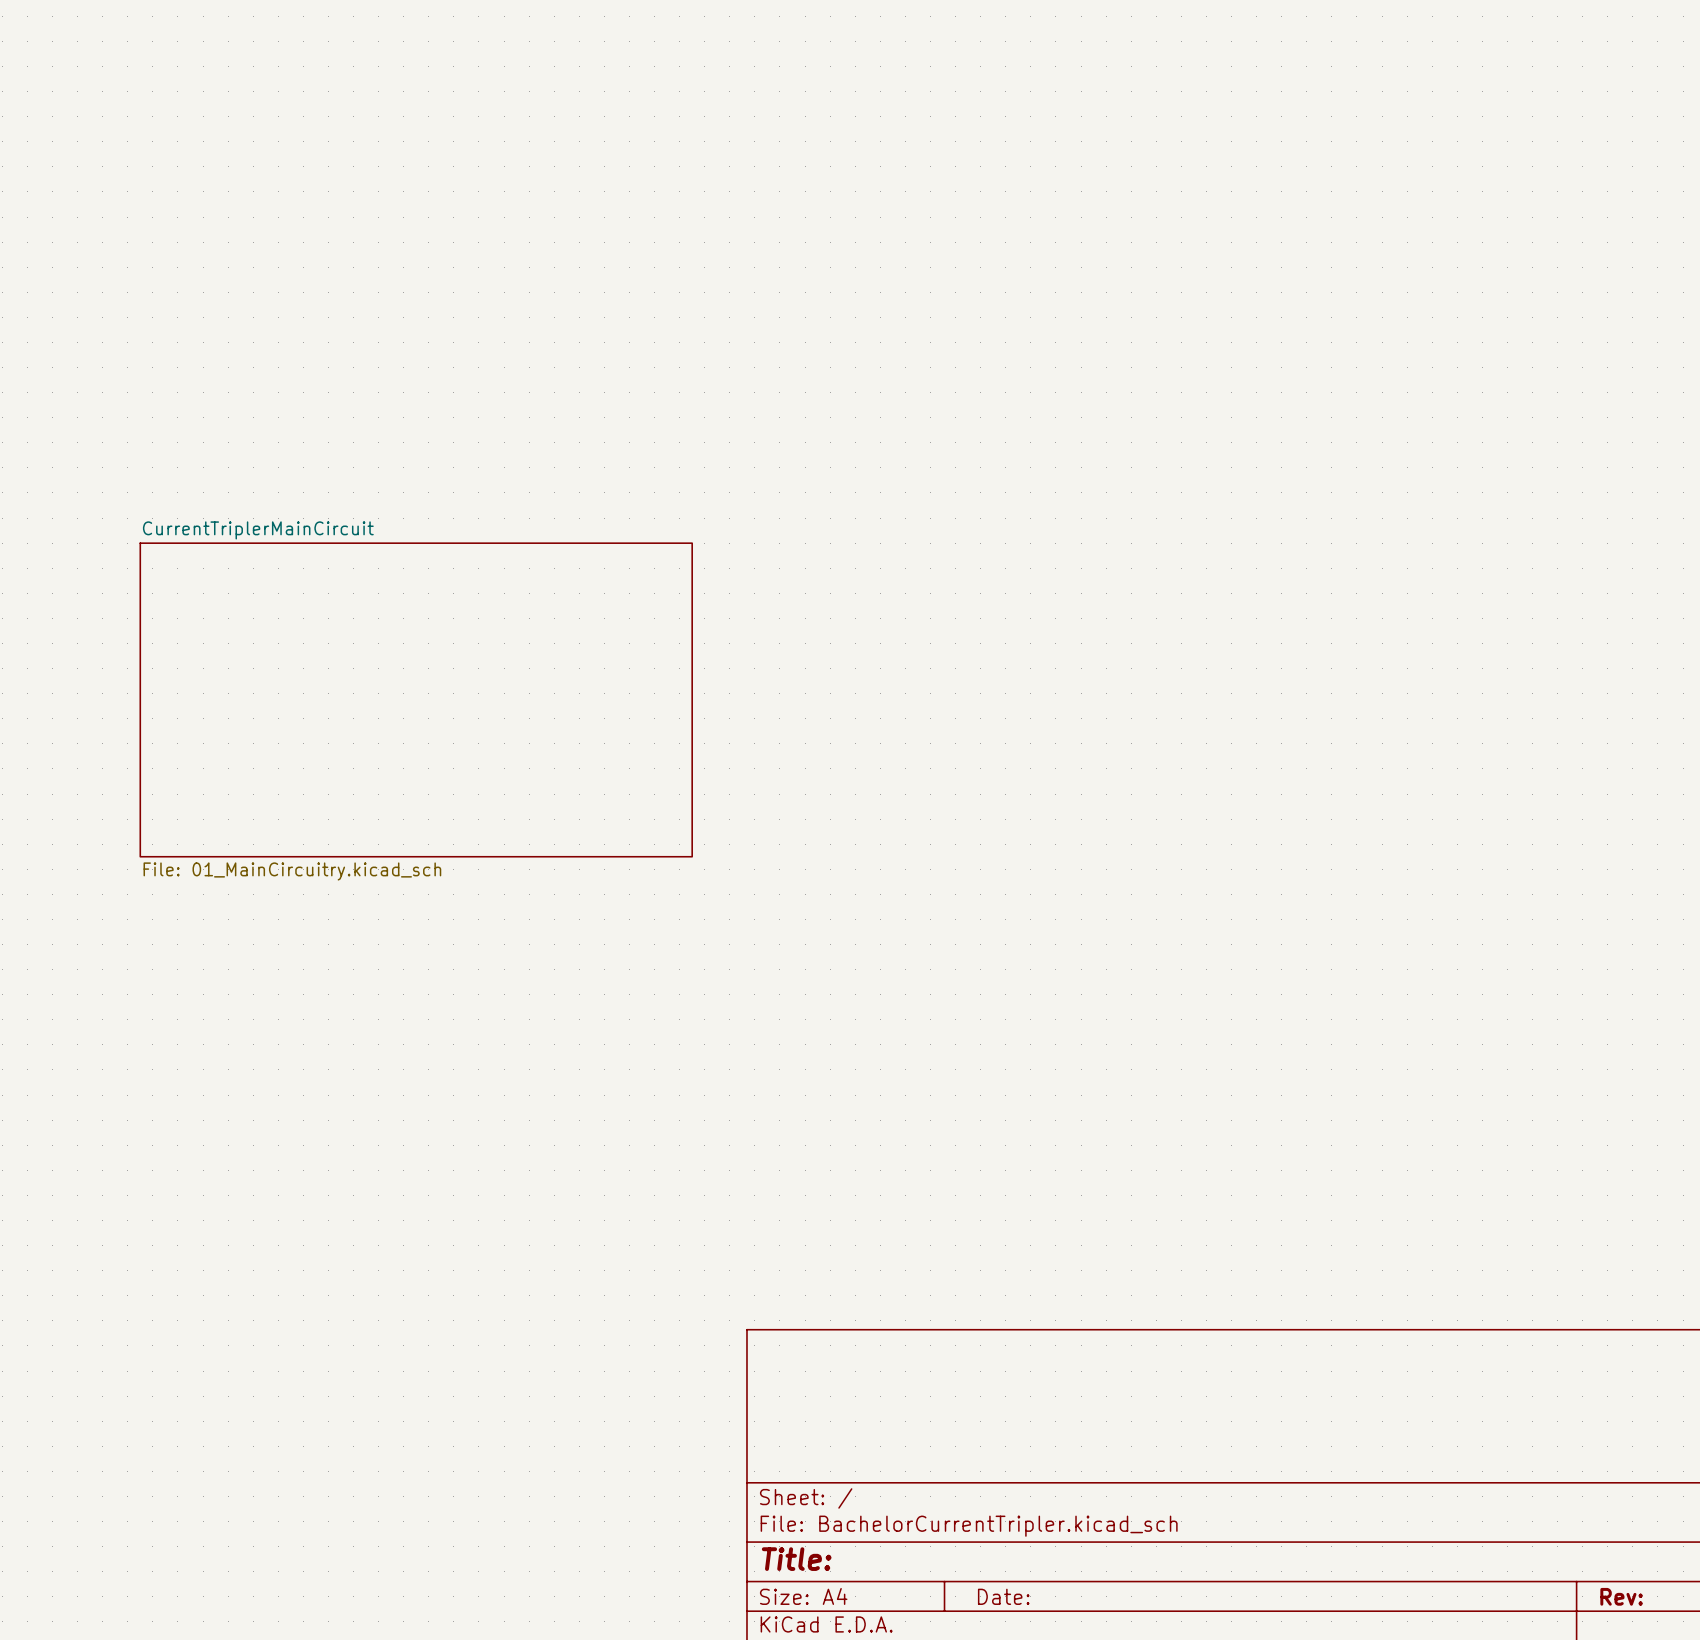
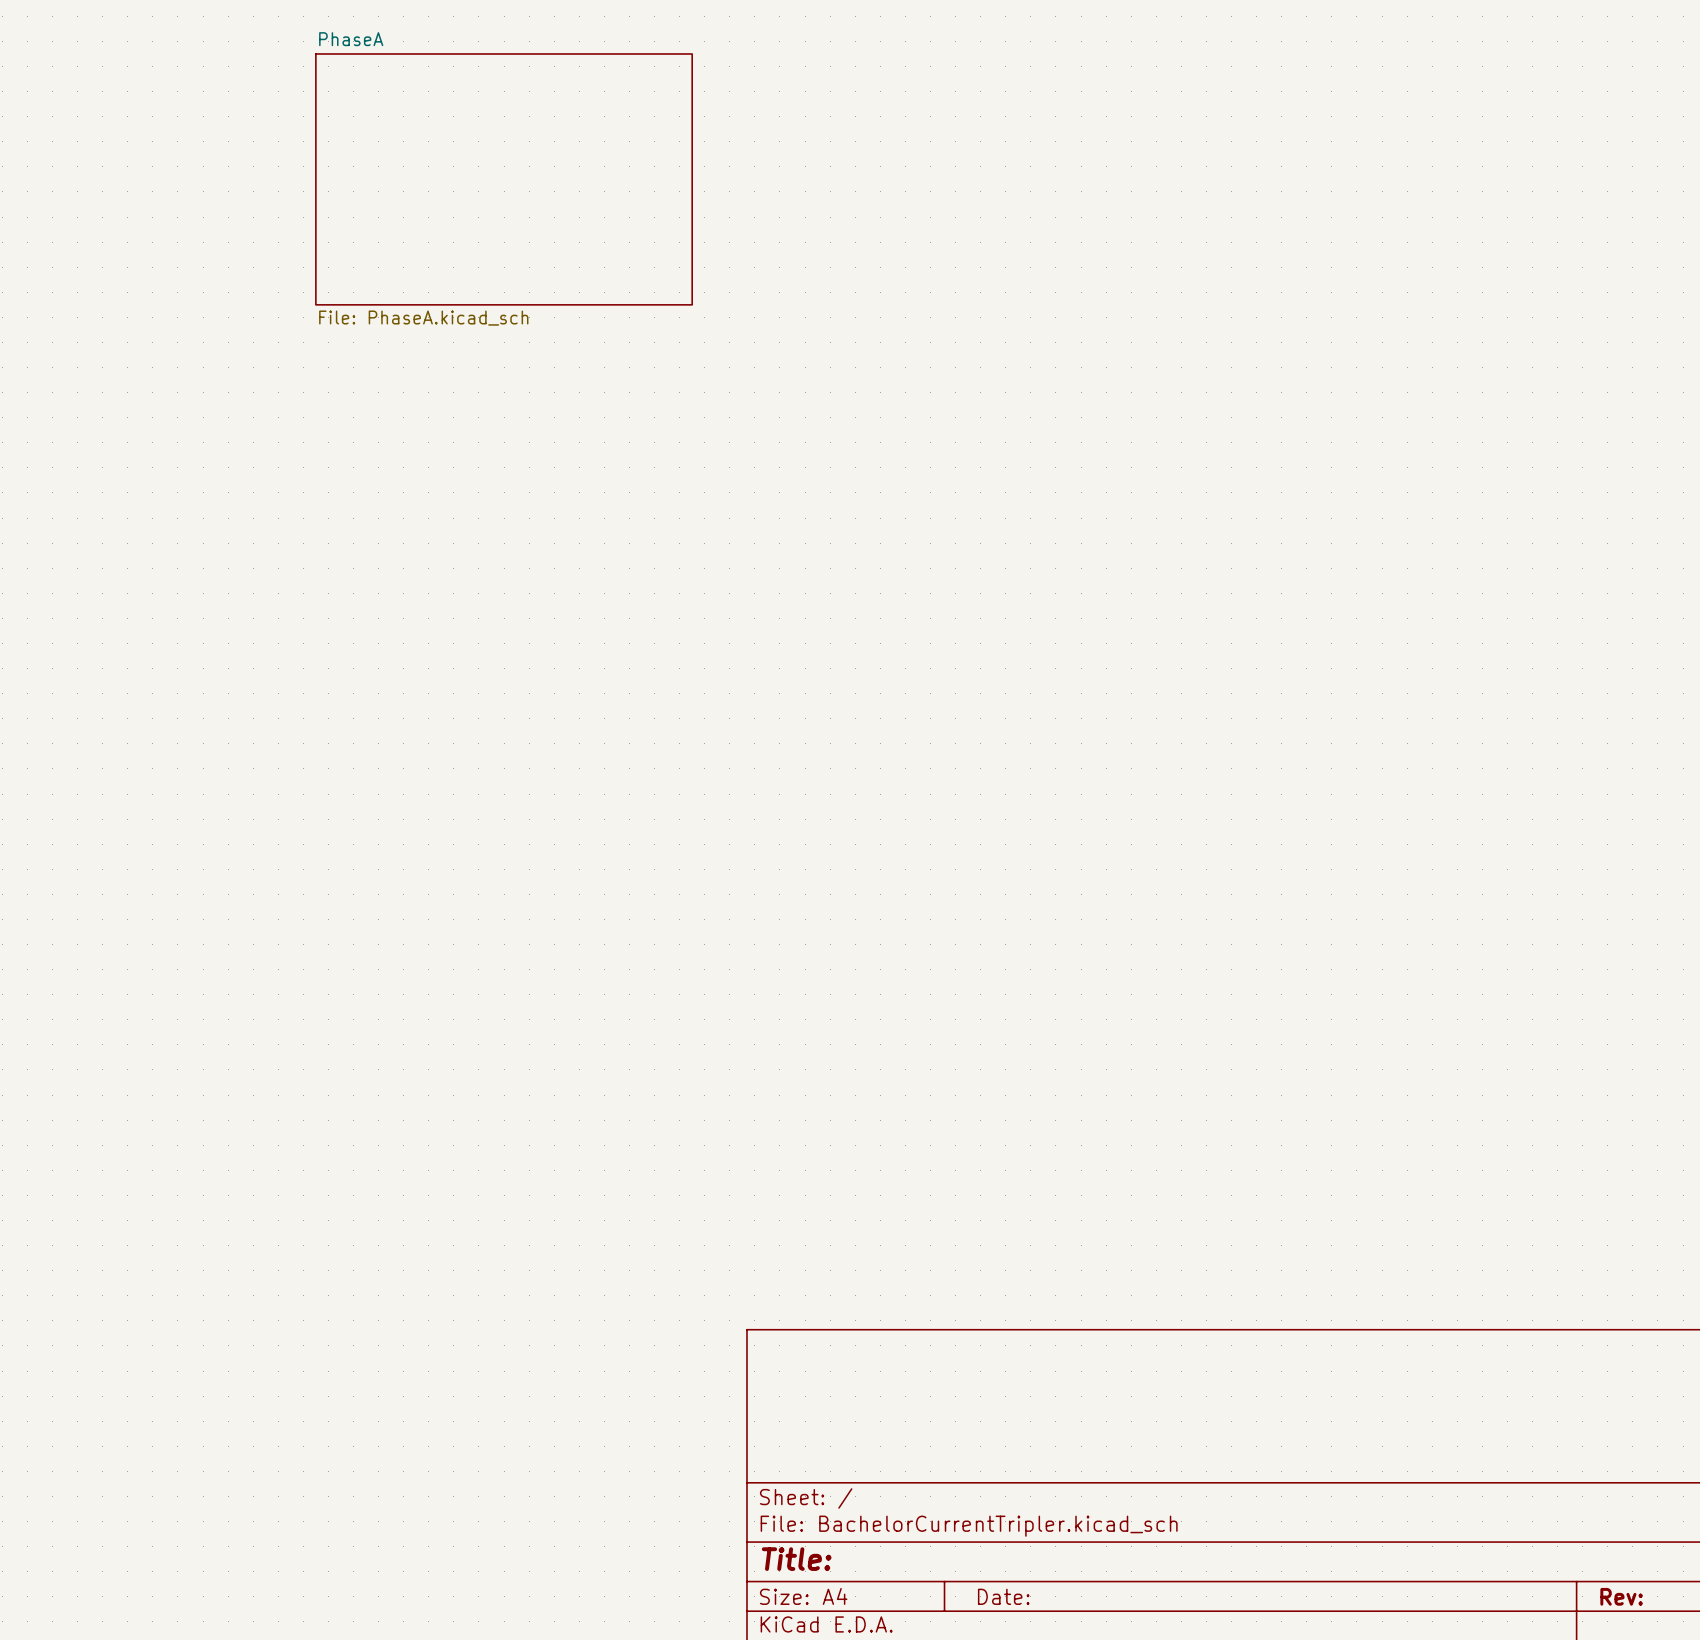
sheet PhaseA: none -> File: PhaseA.kicad_sch (504, 179)
sheet CurrentTriplerMainCircuit: File: 01_MainCircuitry.kicad_sch (416, 699) -> none

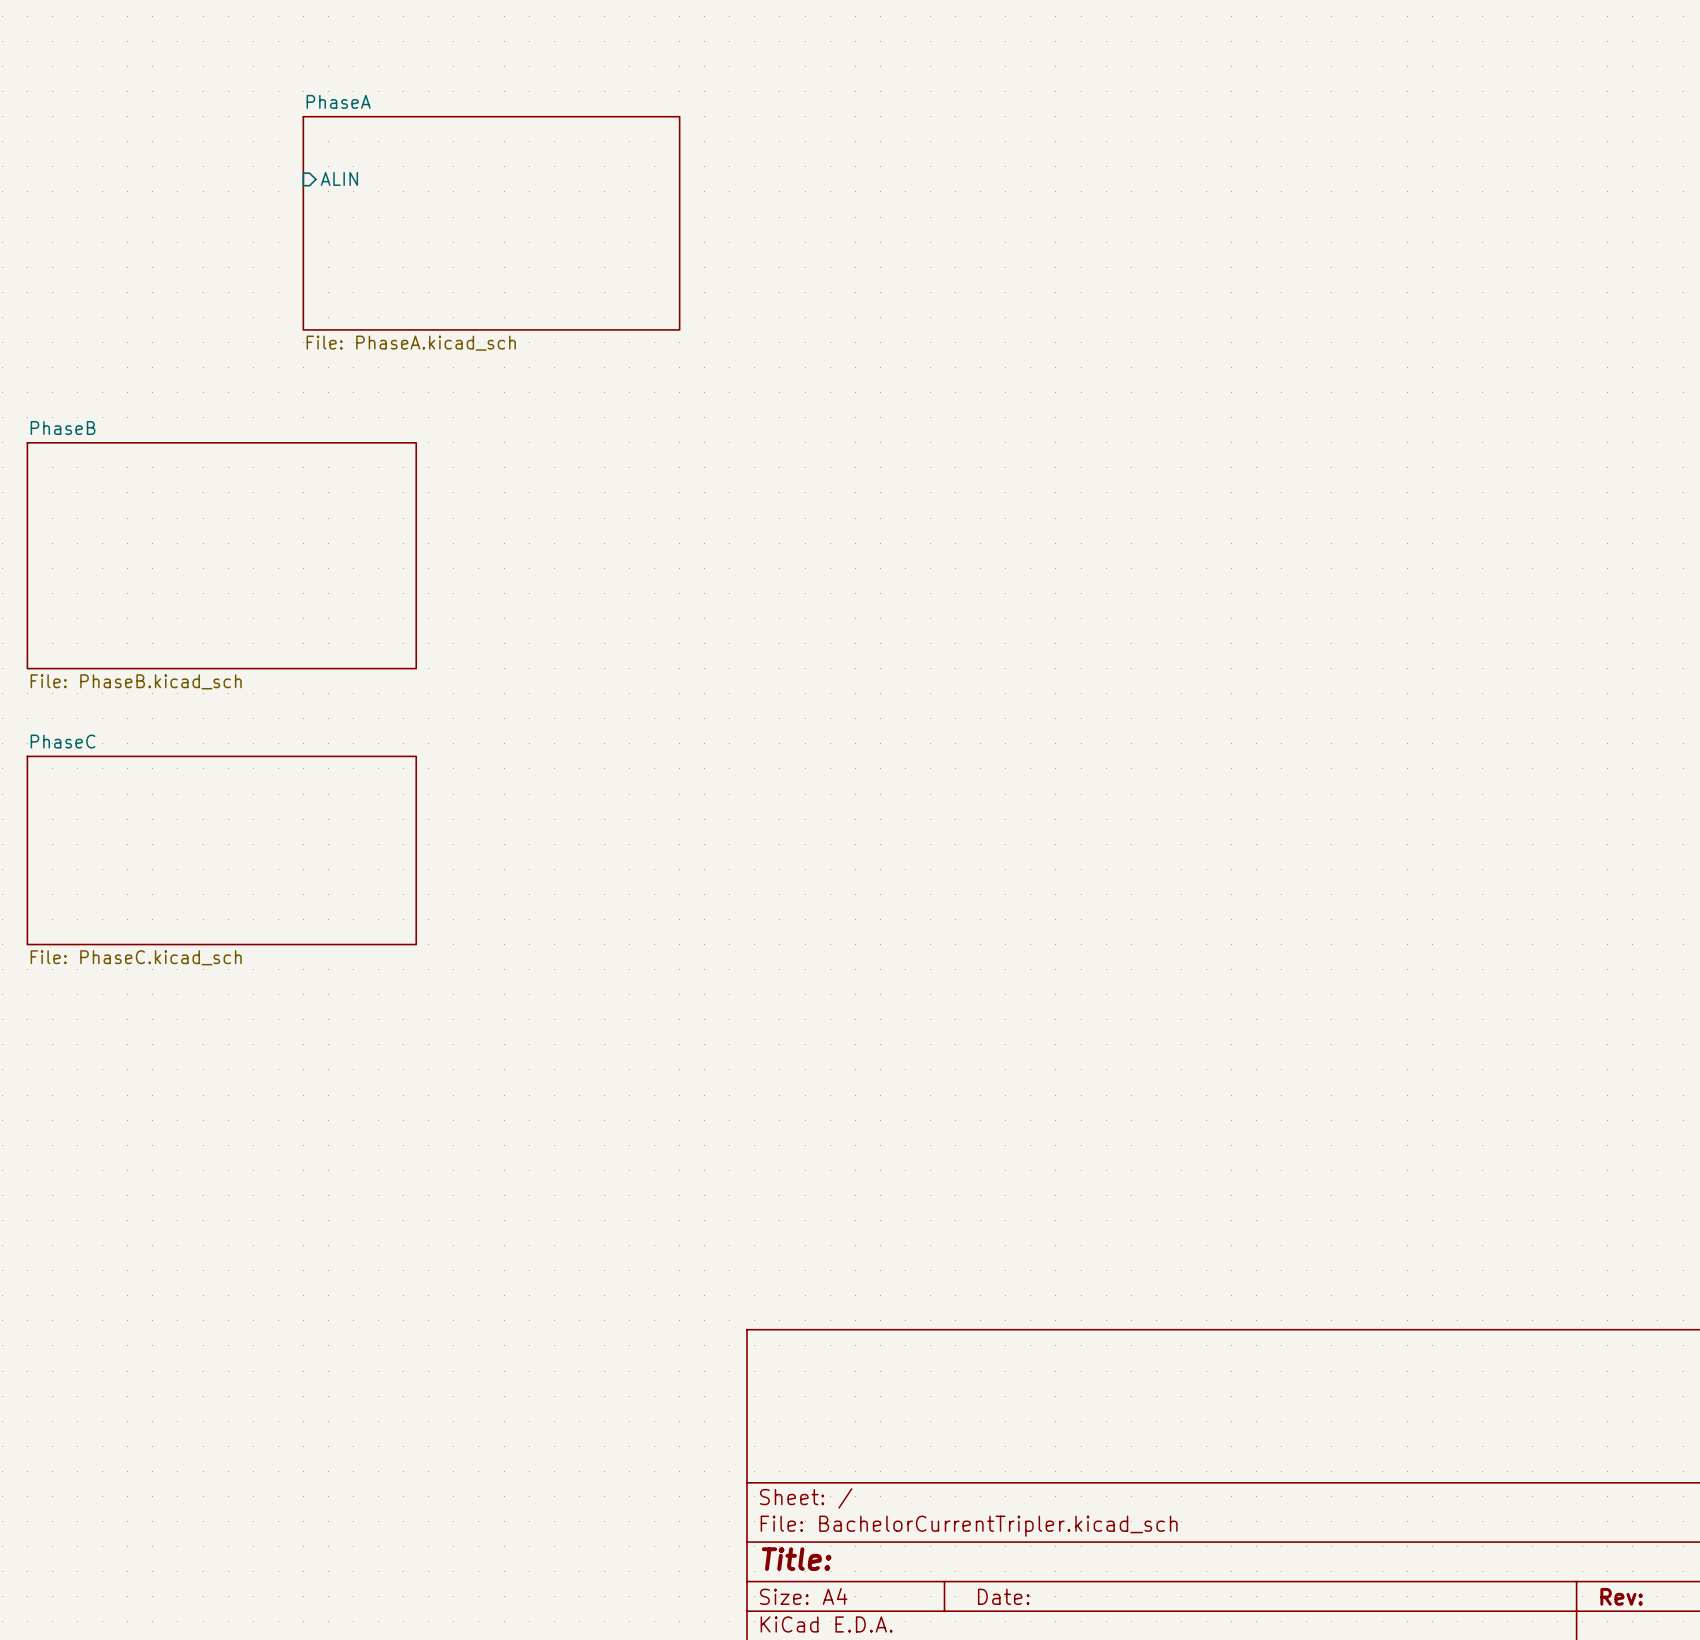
sheet pin: none -> ALIN (339, 178)
sheet PhaseA: File: PhaseA.kicad_sch (504, 179) -> none
sheet PhaseA: none -> File: PhaseA.kicad_sch (491, 223)
sheet PhaseB: none -> File: PhaseB.kicad_sch (221, 555)
sheet PhaseC: none -> File: PhaseC.kicad_sch (221, 850)

